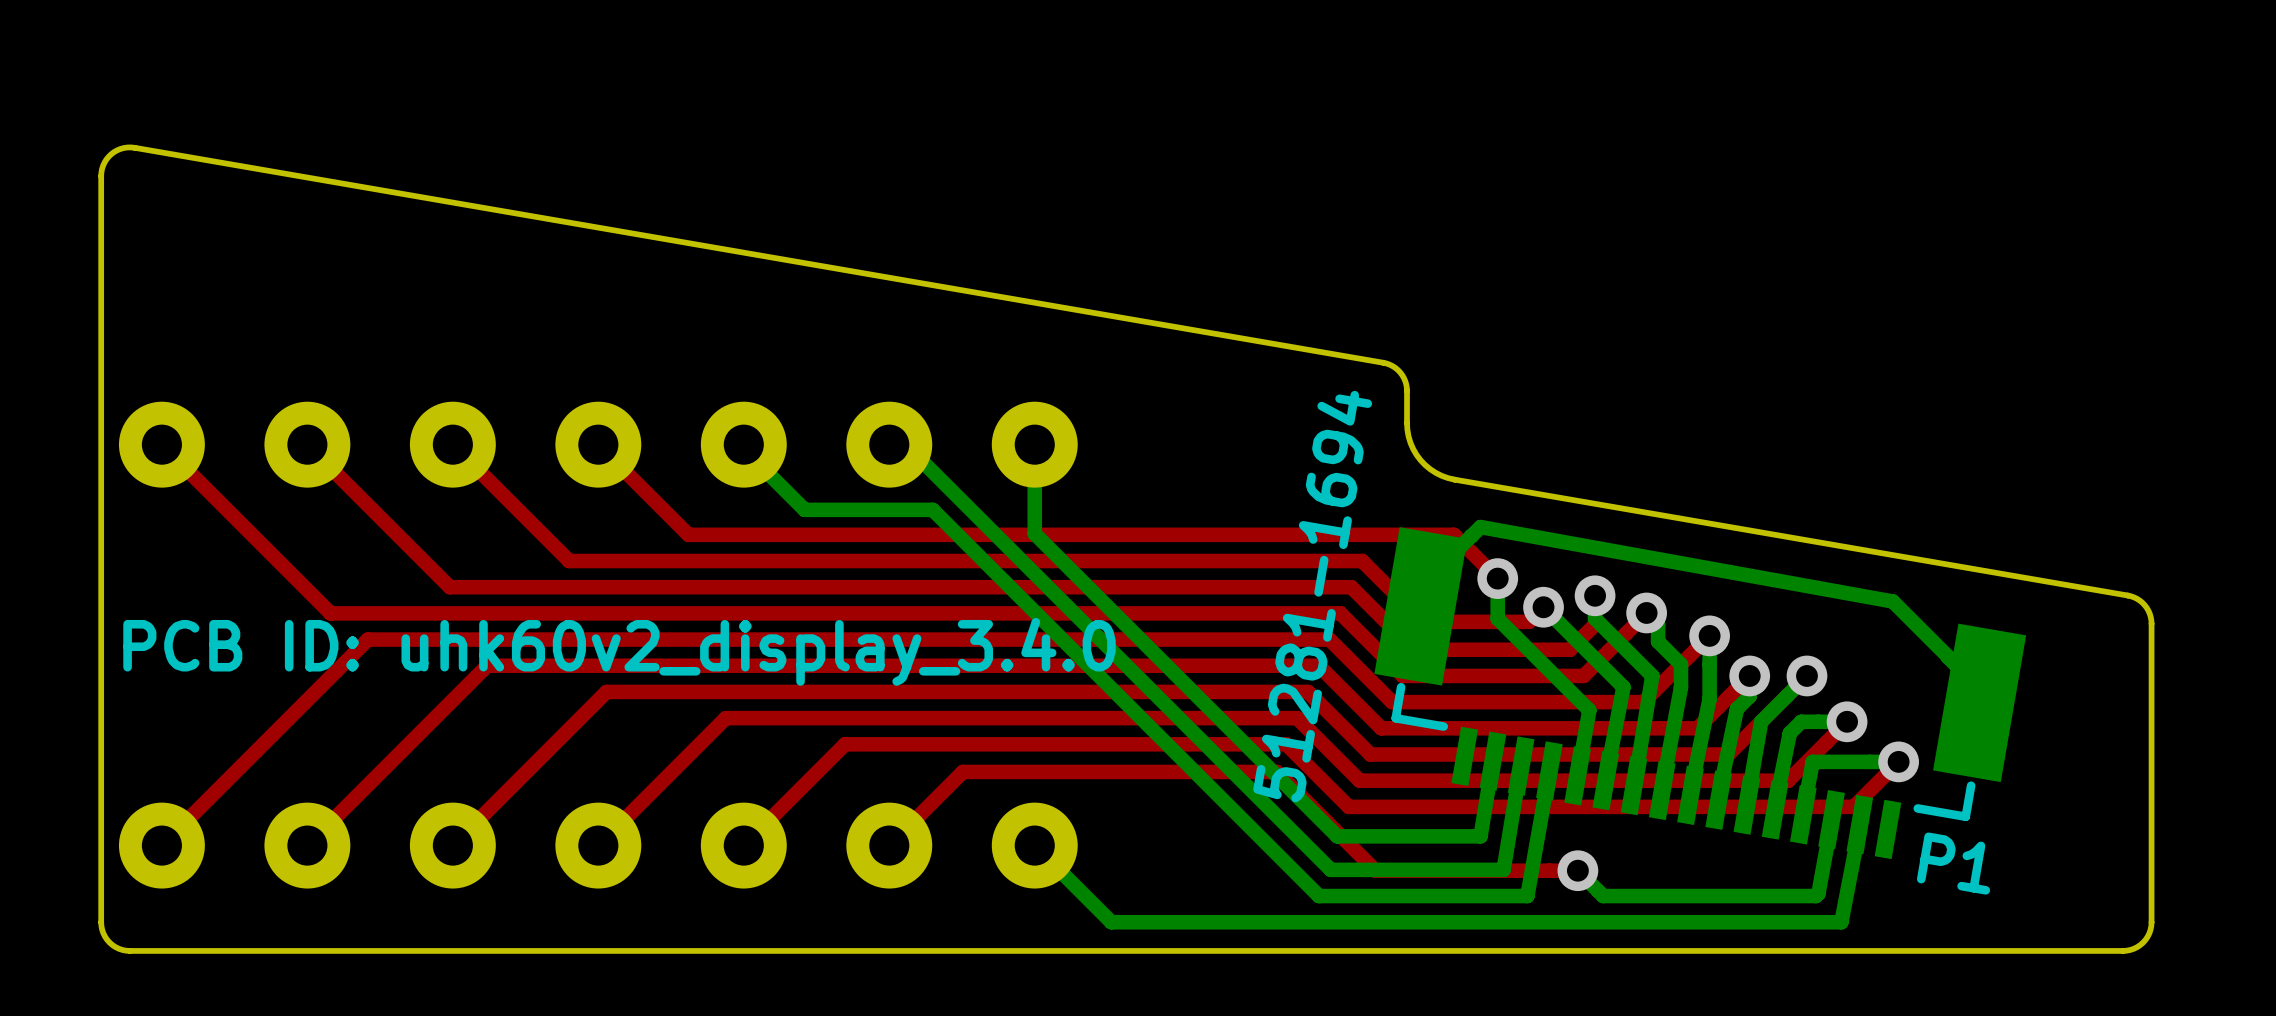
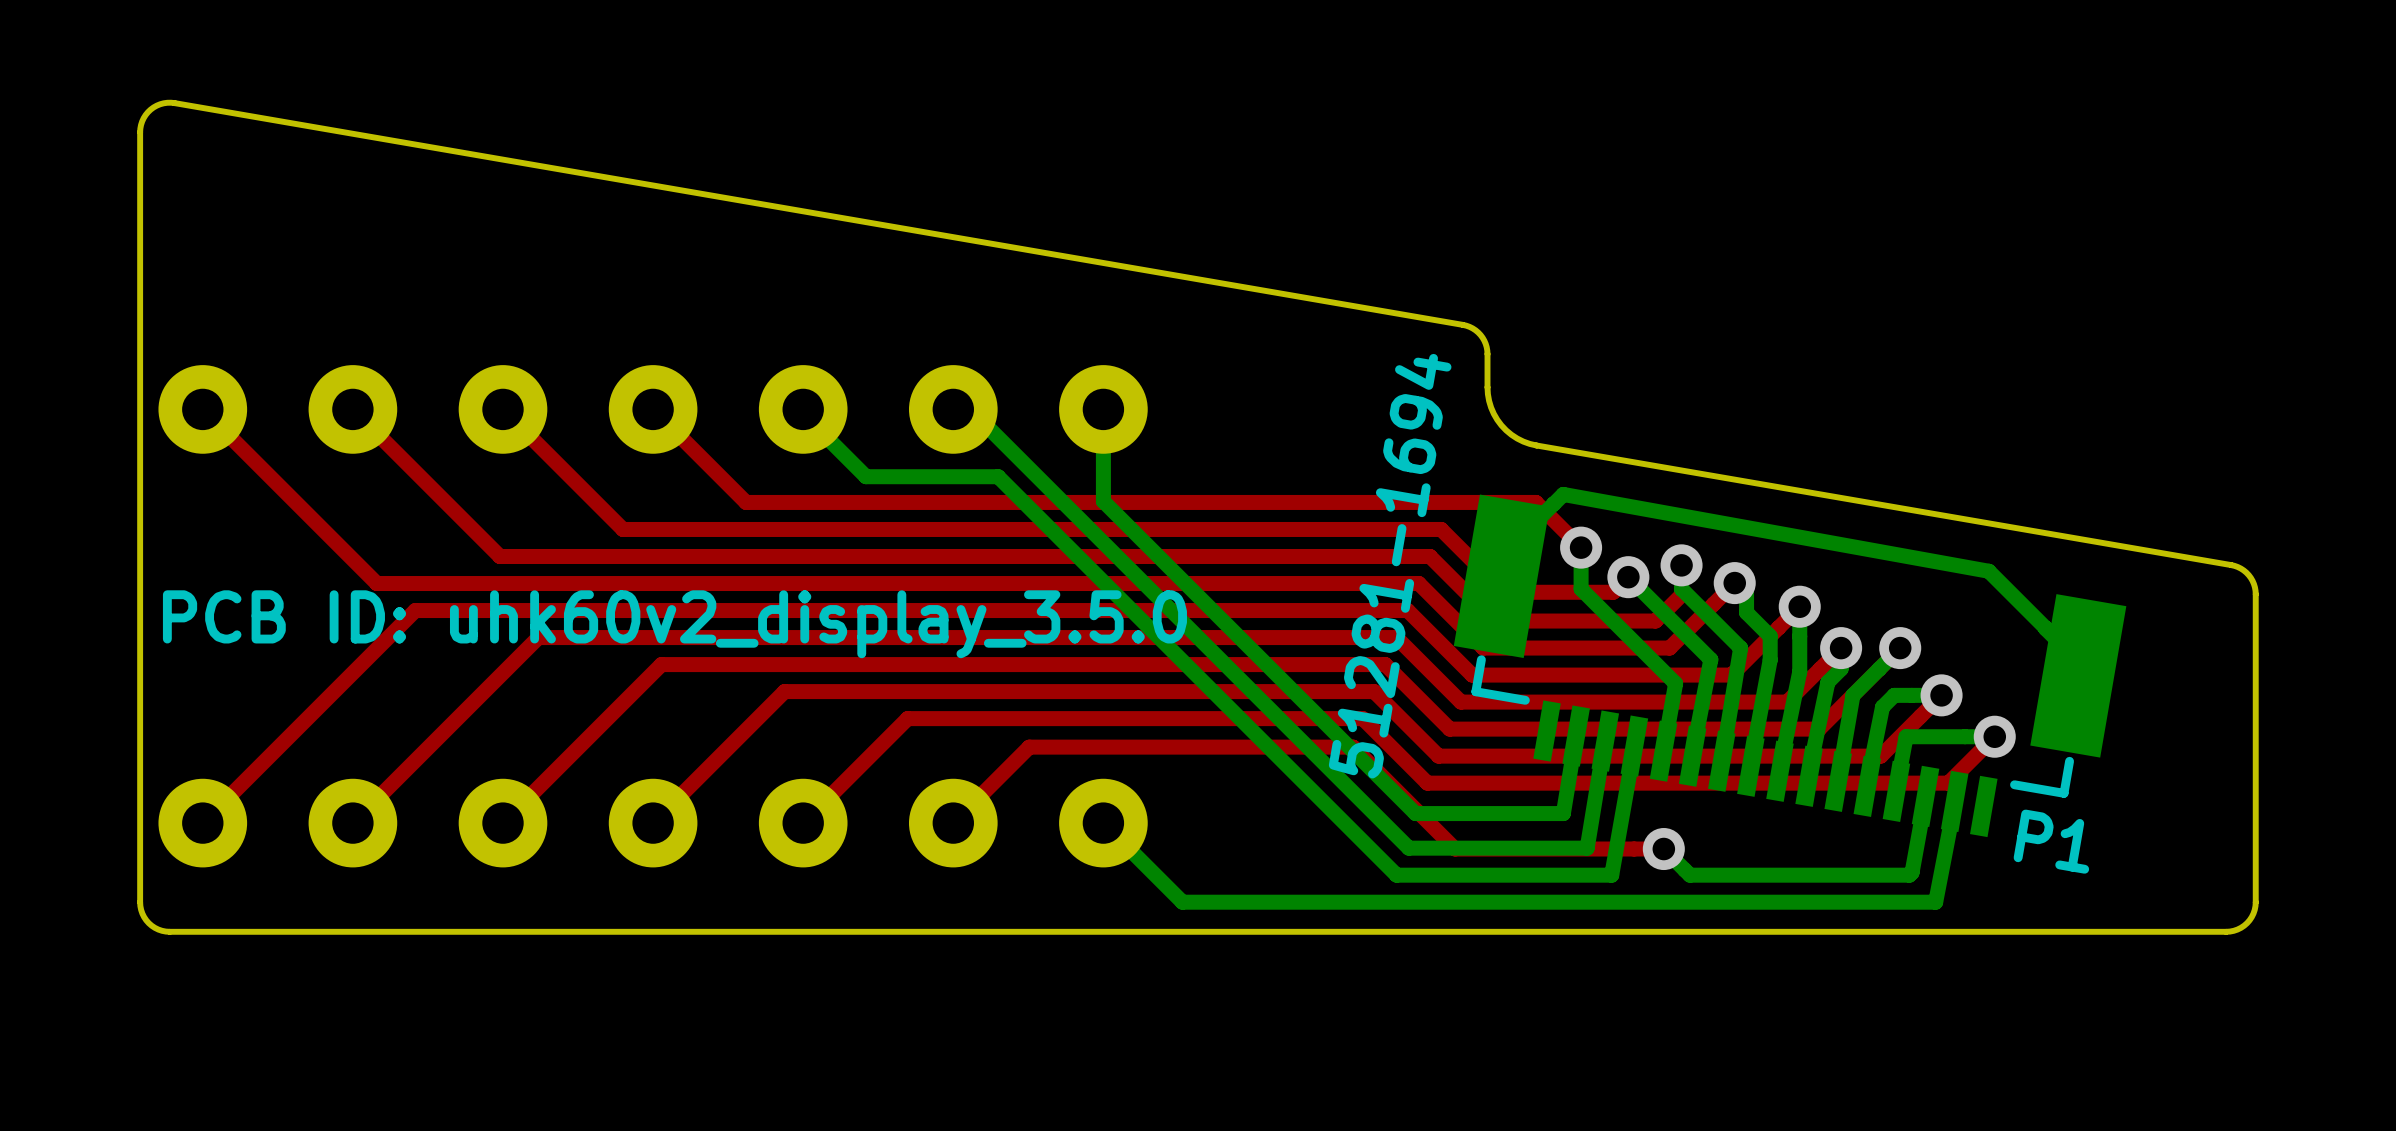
text: PCB ID: uhk60v2_display_3.4.0 (619, 651) -> PCB ID: uhk60v2_display_3.5.0 (674, 624)

